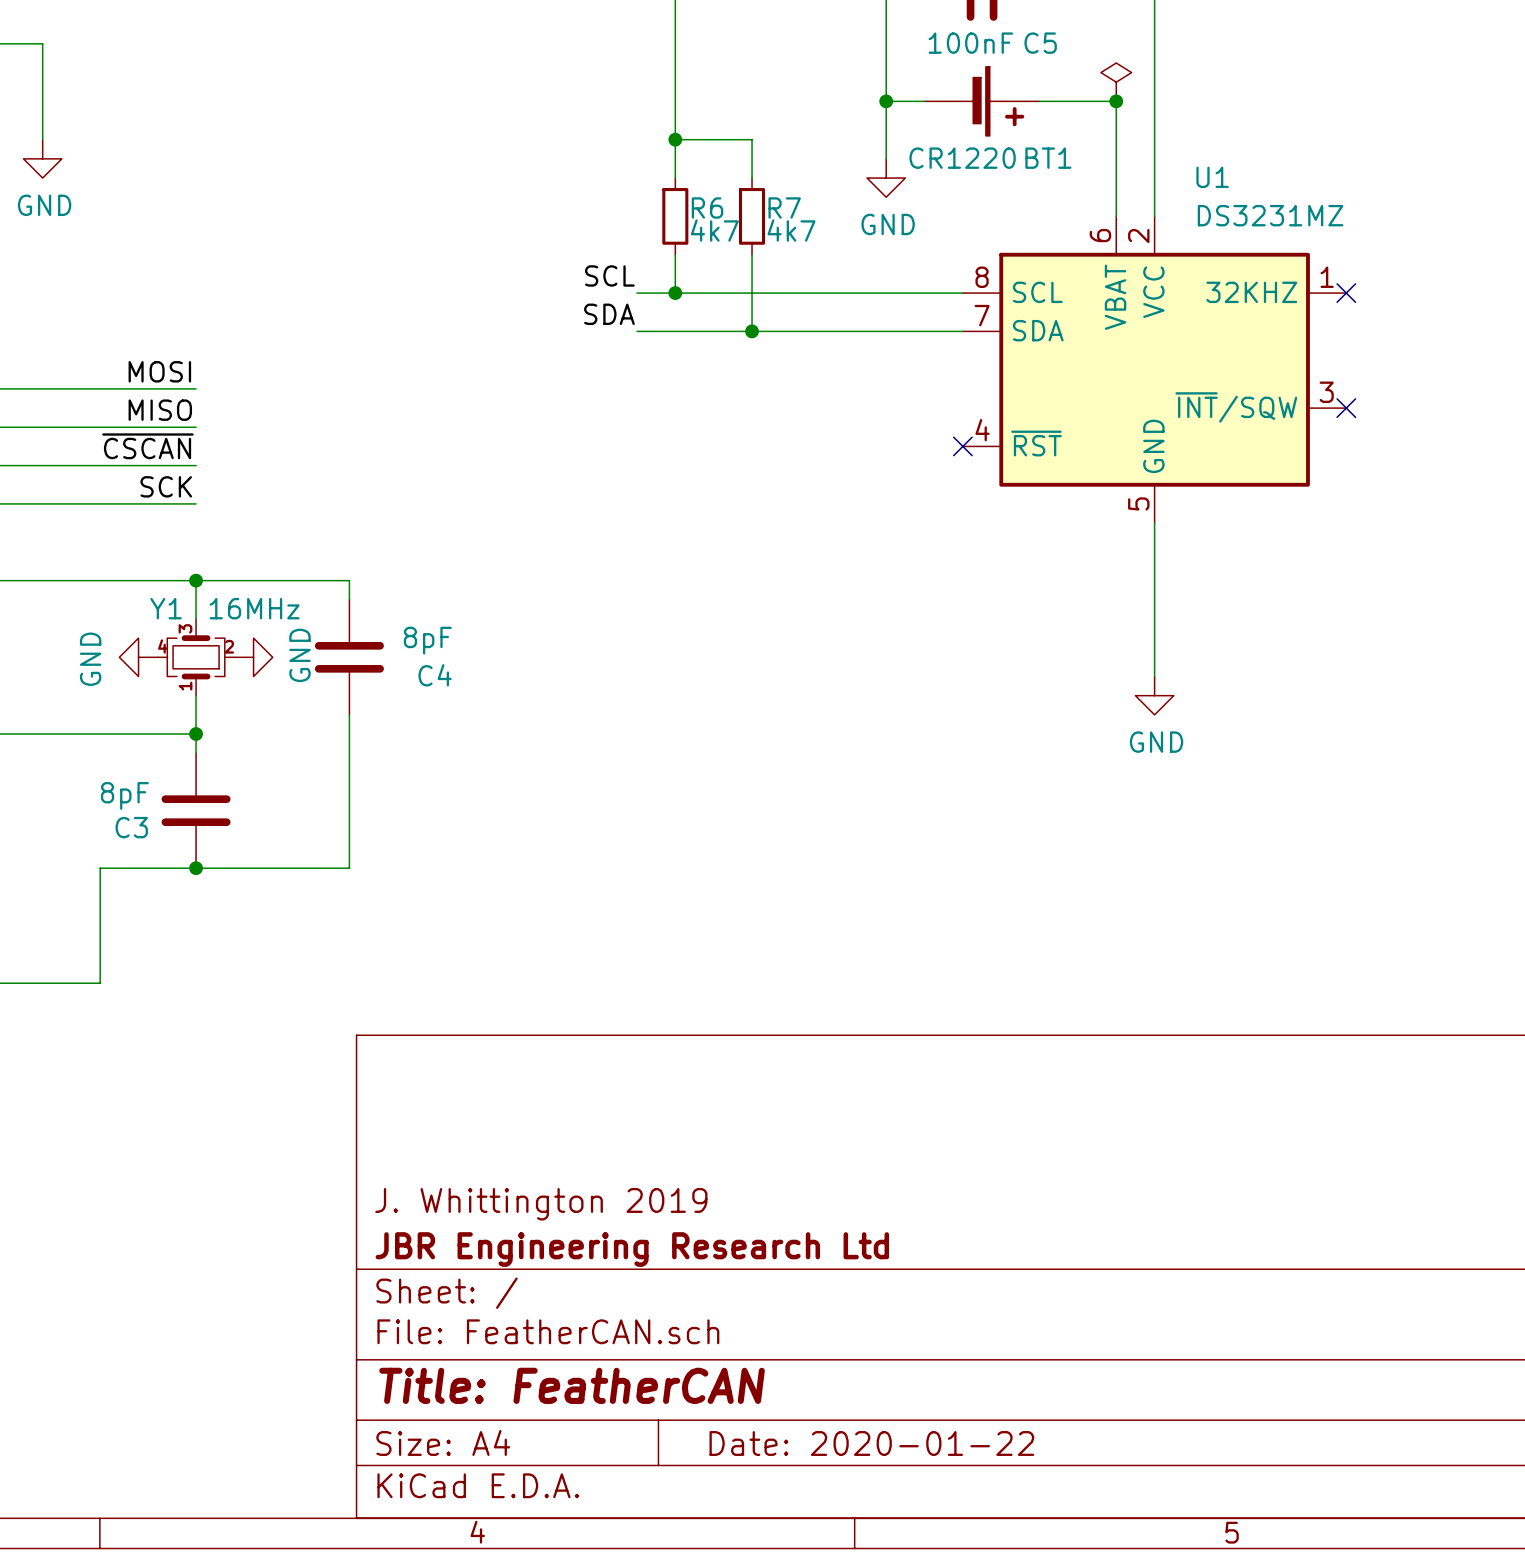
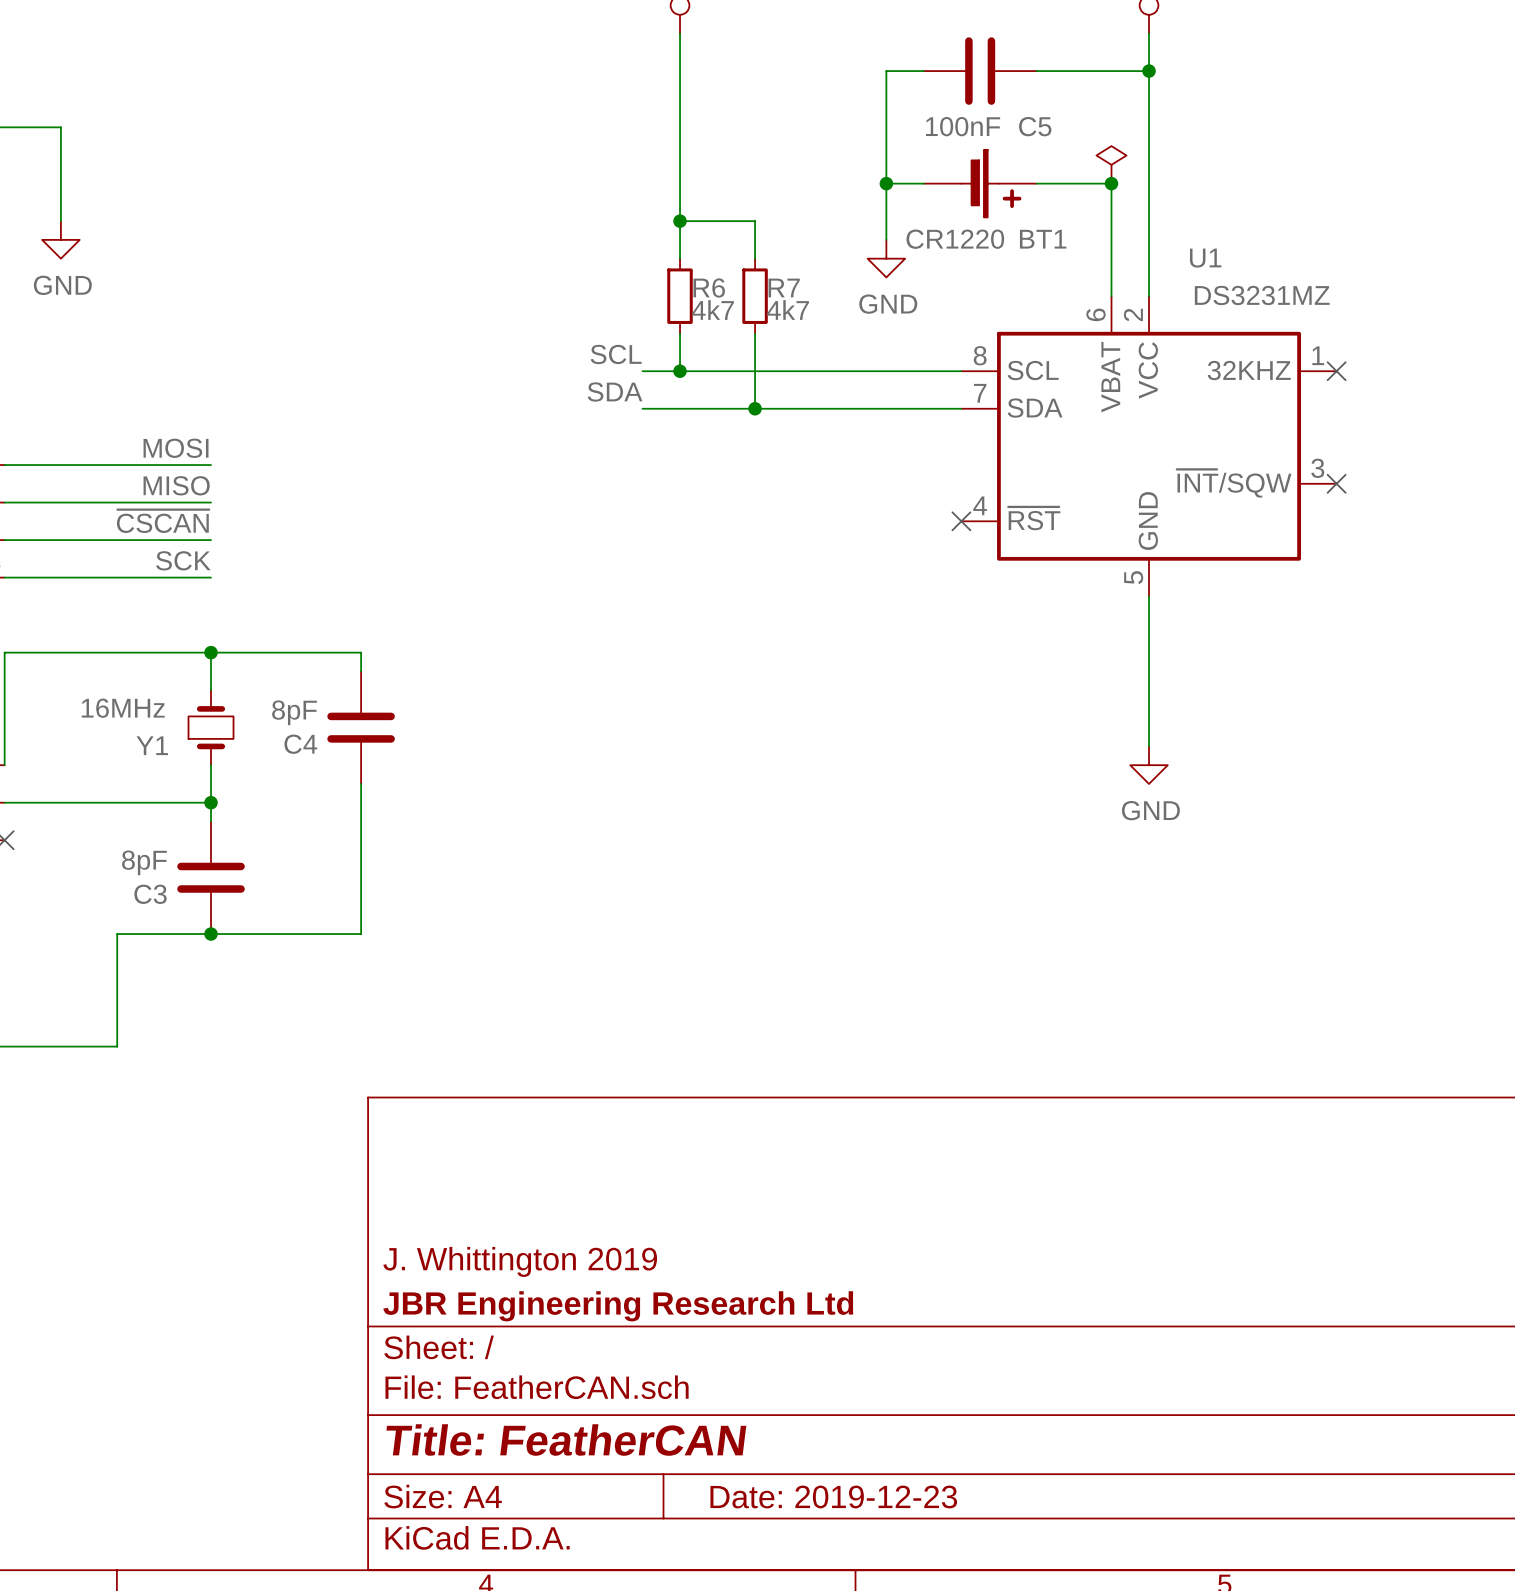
Y1 name position: Y1 (166, 608) -> Y1 (152, 745)
Y1 value position: 16MHz (254, 608) -> 16MHz (123, 708)
Y1 symbol: [157, 618, 235, 696] -> [188, 690, 234, 766]
C4 value position: 8pF (427, 640) -> 8pF (294, 712)
power symbol: GND (138, 657) -> none
power symbol: GND (253, 657) -> none
C4 name position: C4 (435, 675) -> C4 (300, 744)
title block: Date: 2020-01-22 (871, 1443) -> Date: 2019-12-23 (833, 1496)

